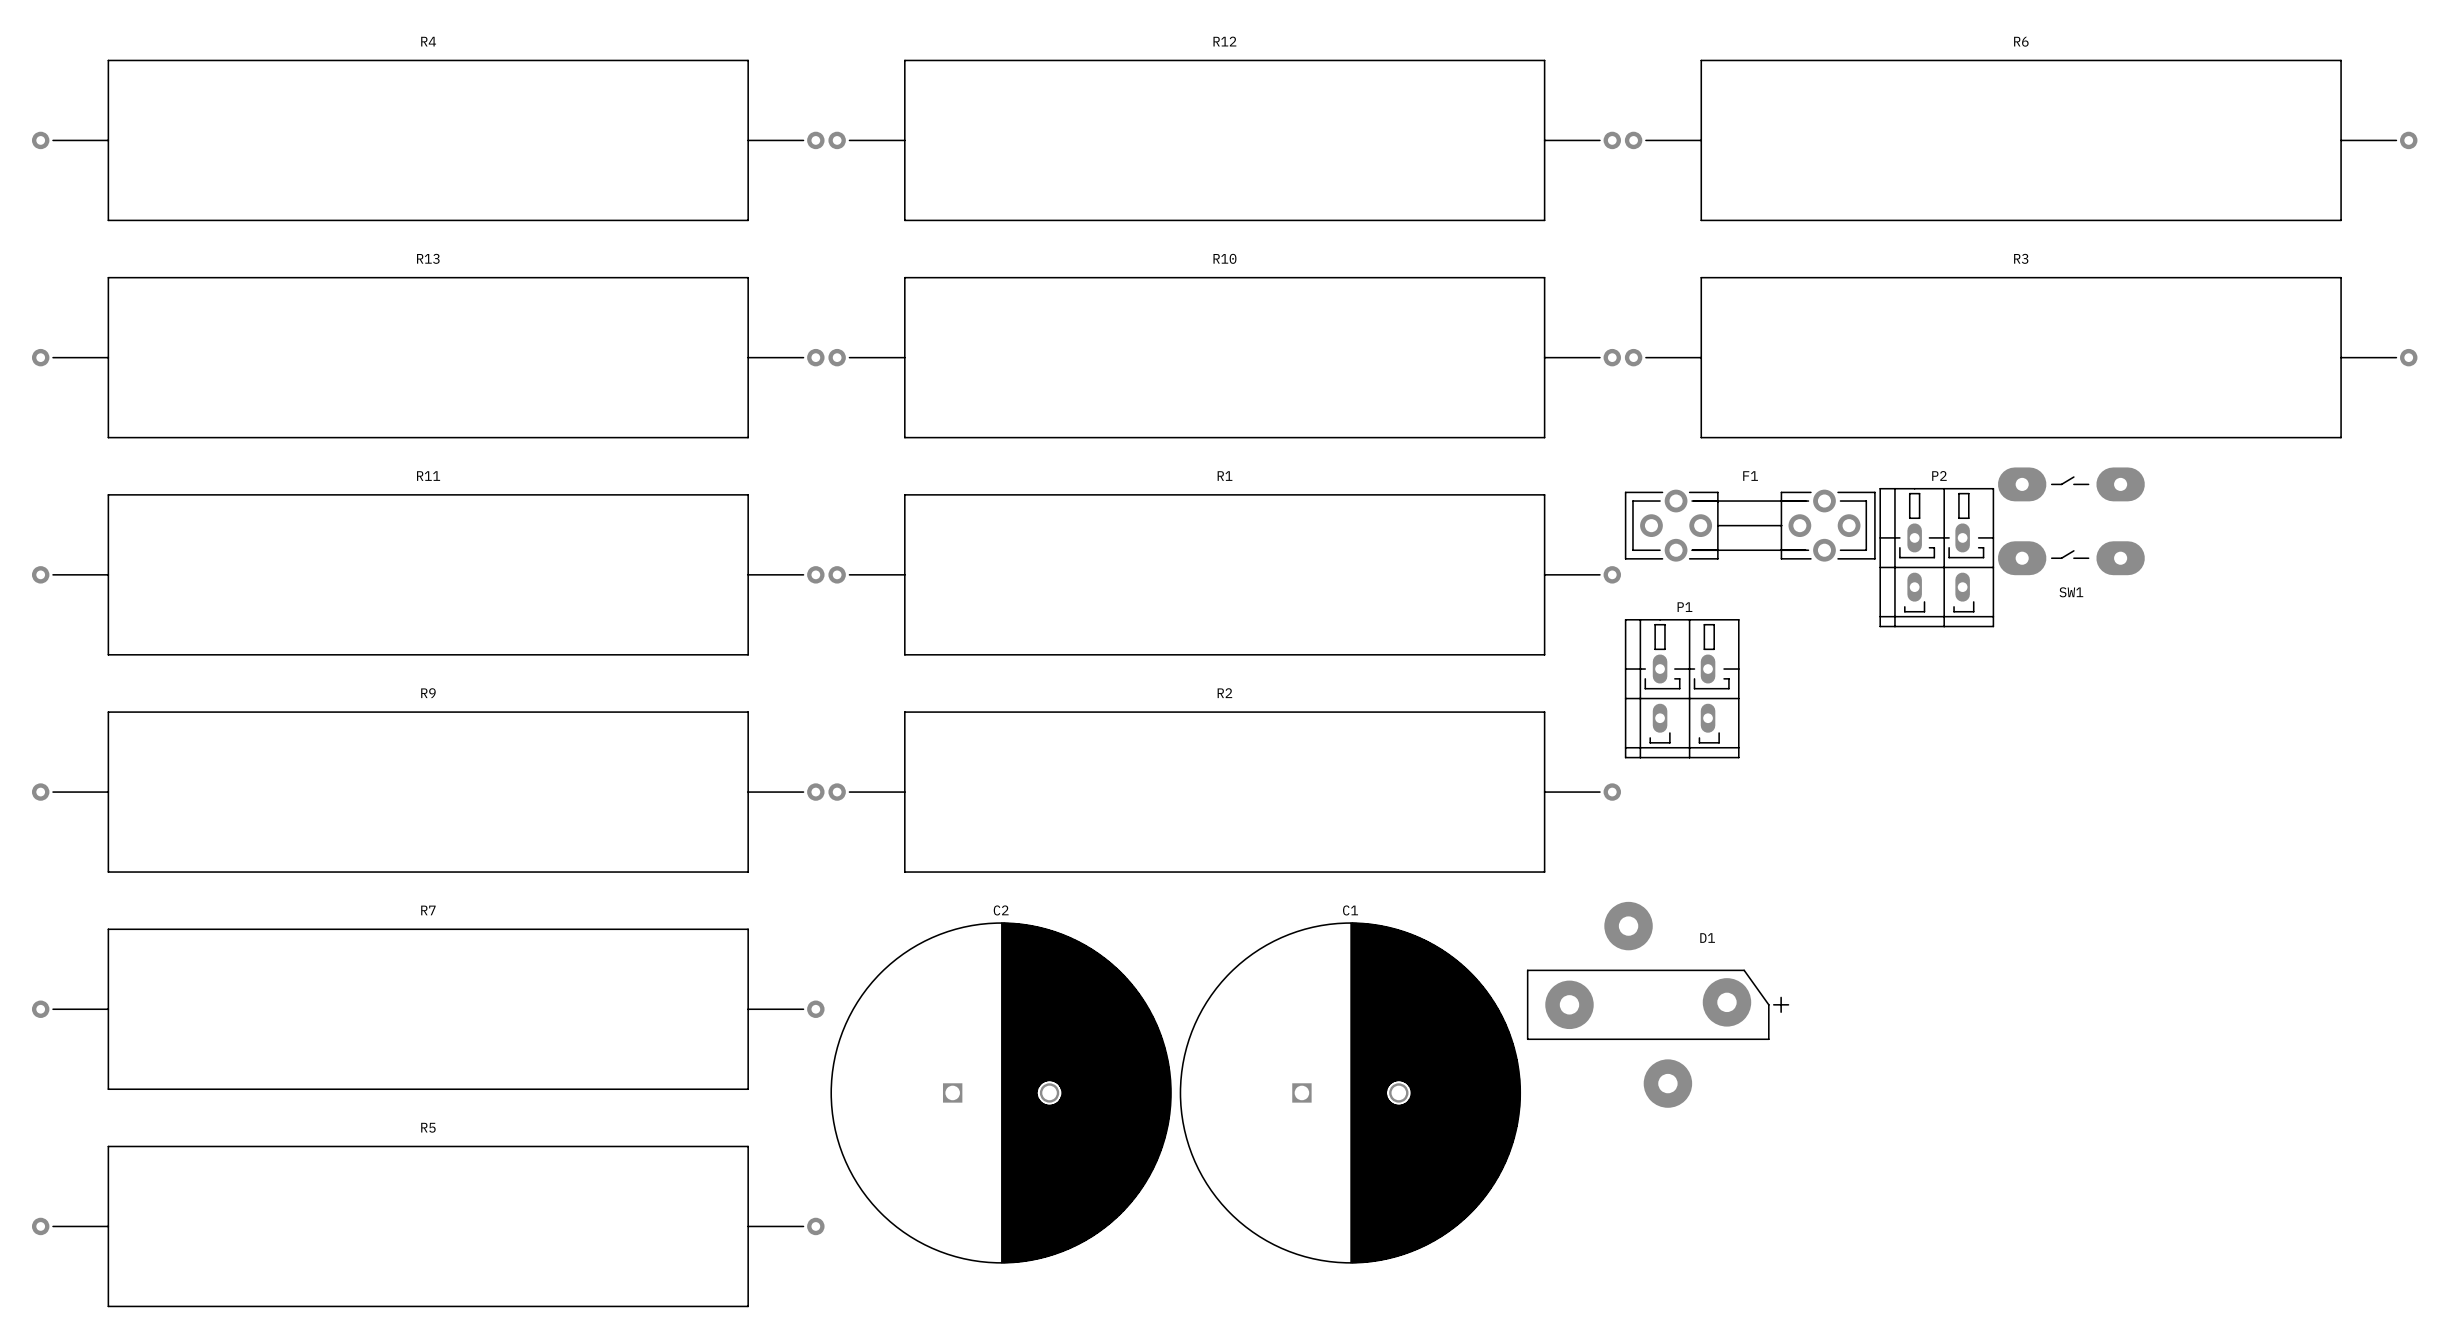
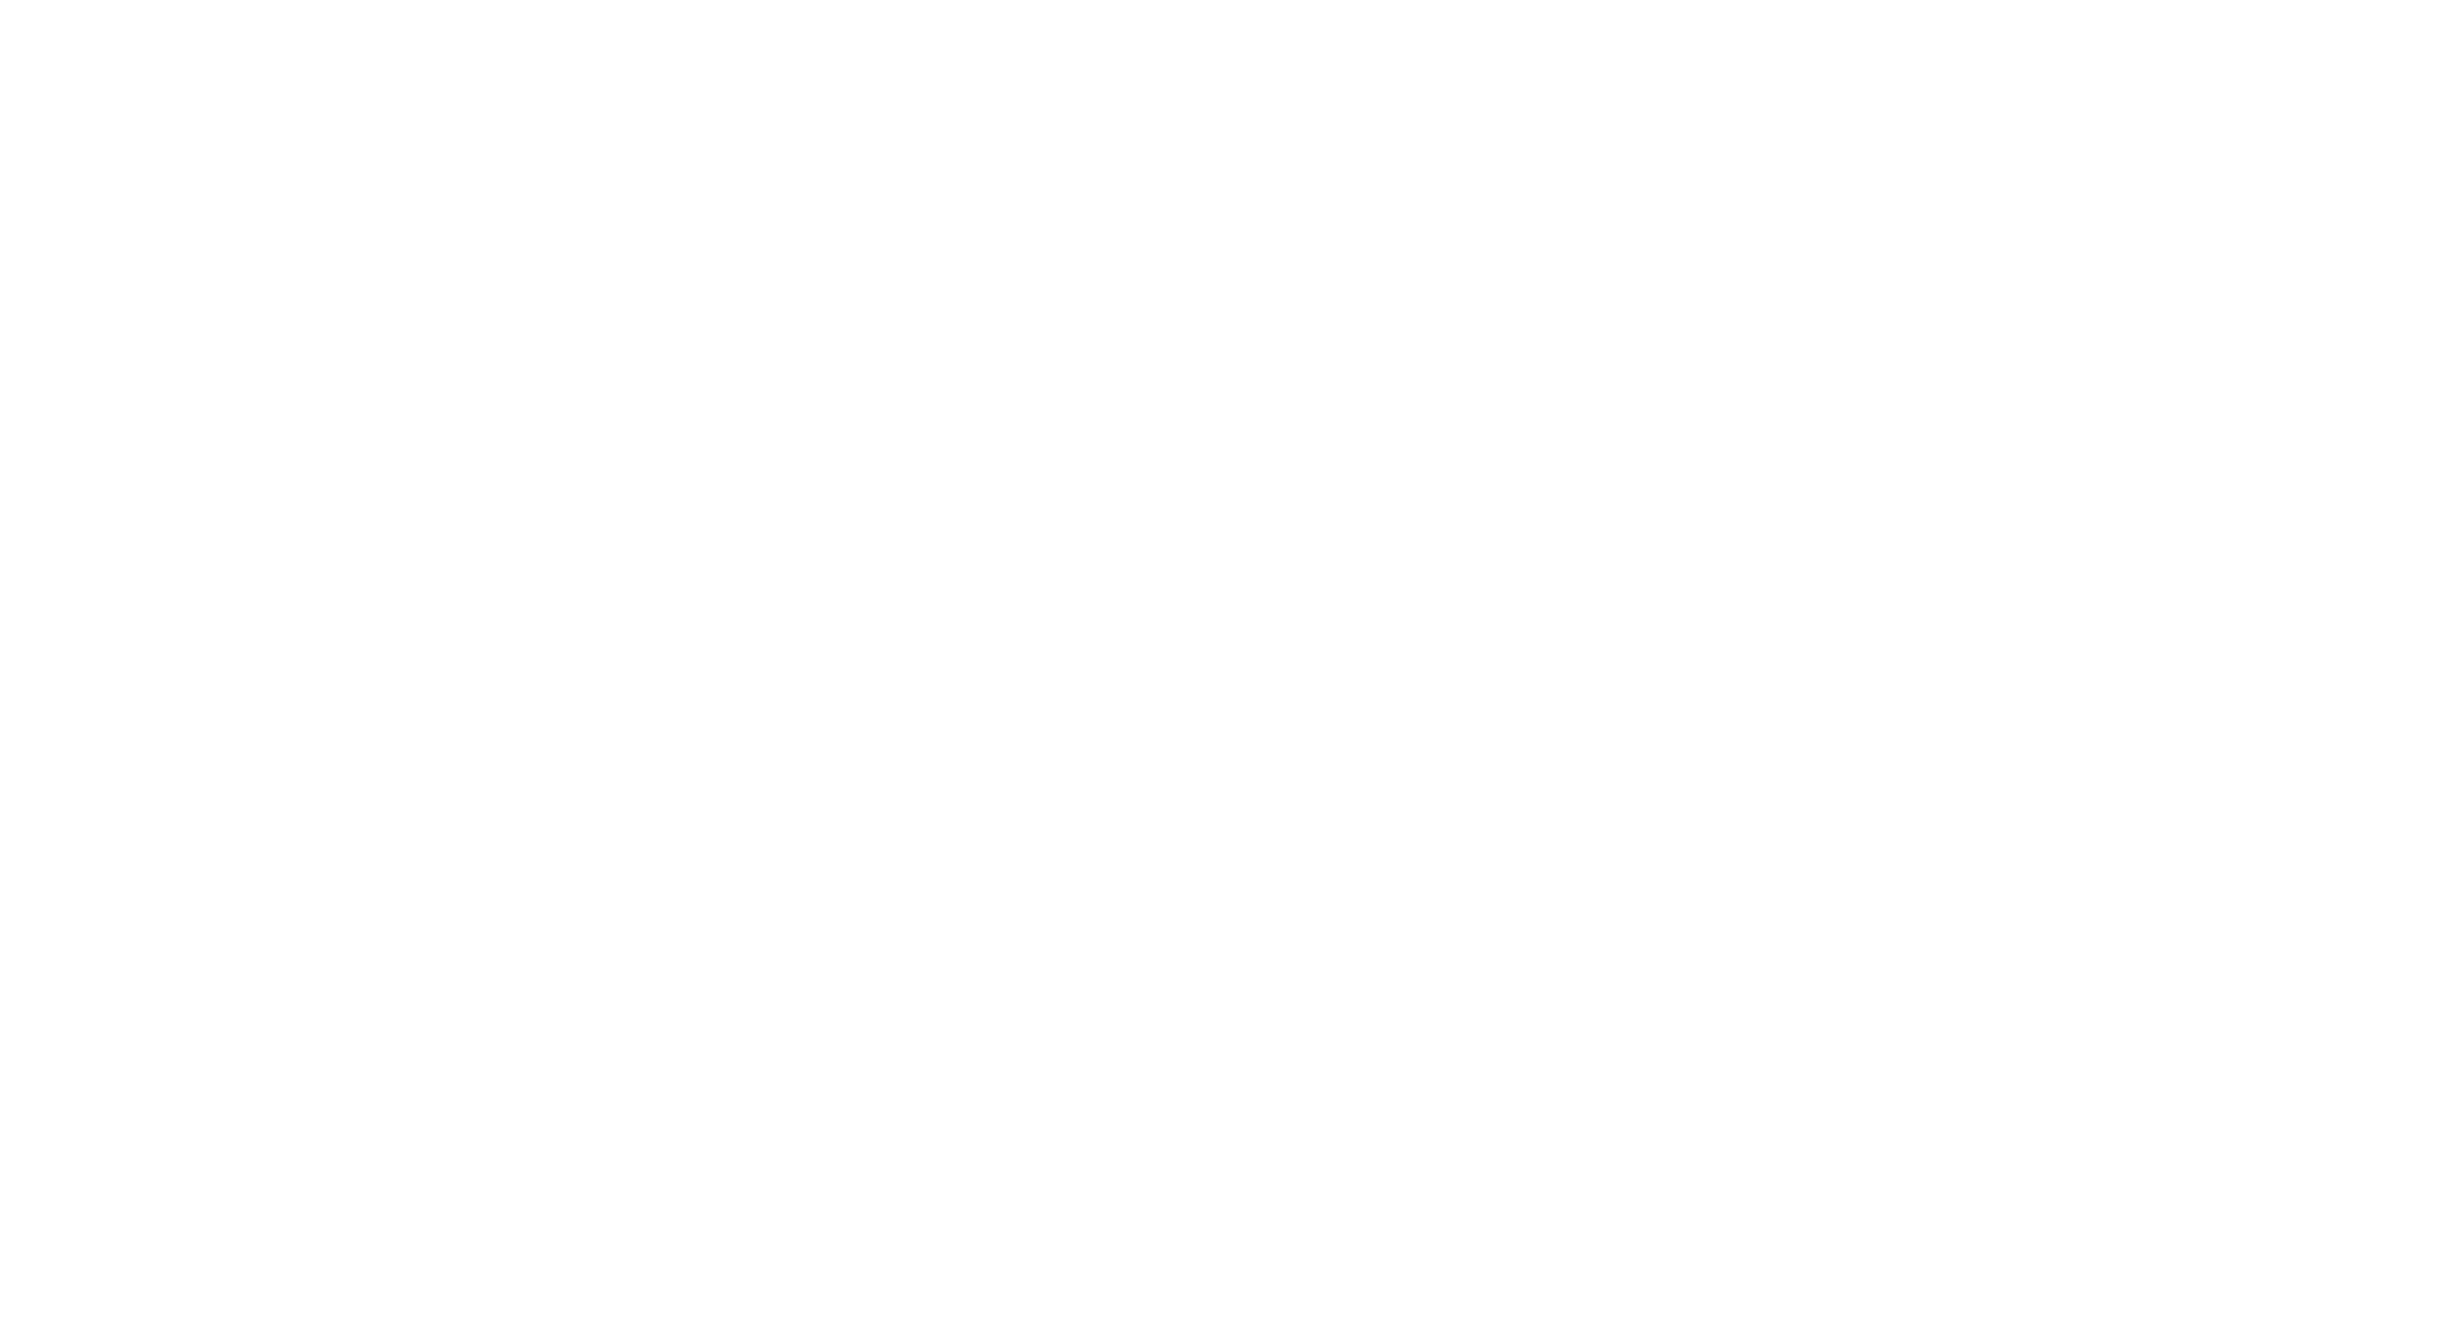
R4: (428, 140) -> none
R12: (1224, 140) -> none
R6: (2021, 140) -> none
R13: (428, 357) -> none
R10: (1224, 357) -> none
R3: (2021, 357) -> none
SW1: (2071, 521) -> none
F1: (1750, 525) -> none
P2: (1936, 557) -> none
R11: (428, 574) -> none
R1: (1224, 574) -> none
P1: (1682, 688) -> none
R9: (428, 792) -> none
R2: (1224, 792) -> none
D1: (1658, 1004) -> none
R7: (428, 1009) -> none
C2: (1001, 1092) -> none
C1: (1350, 1092) -> none
R5: (428, 1226) -> none

